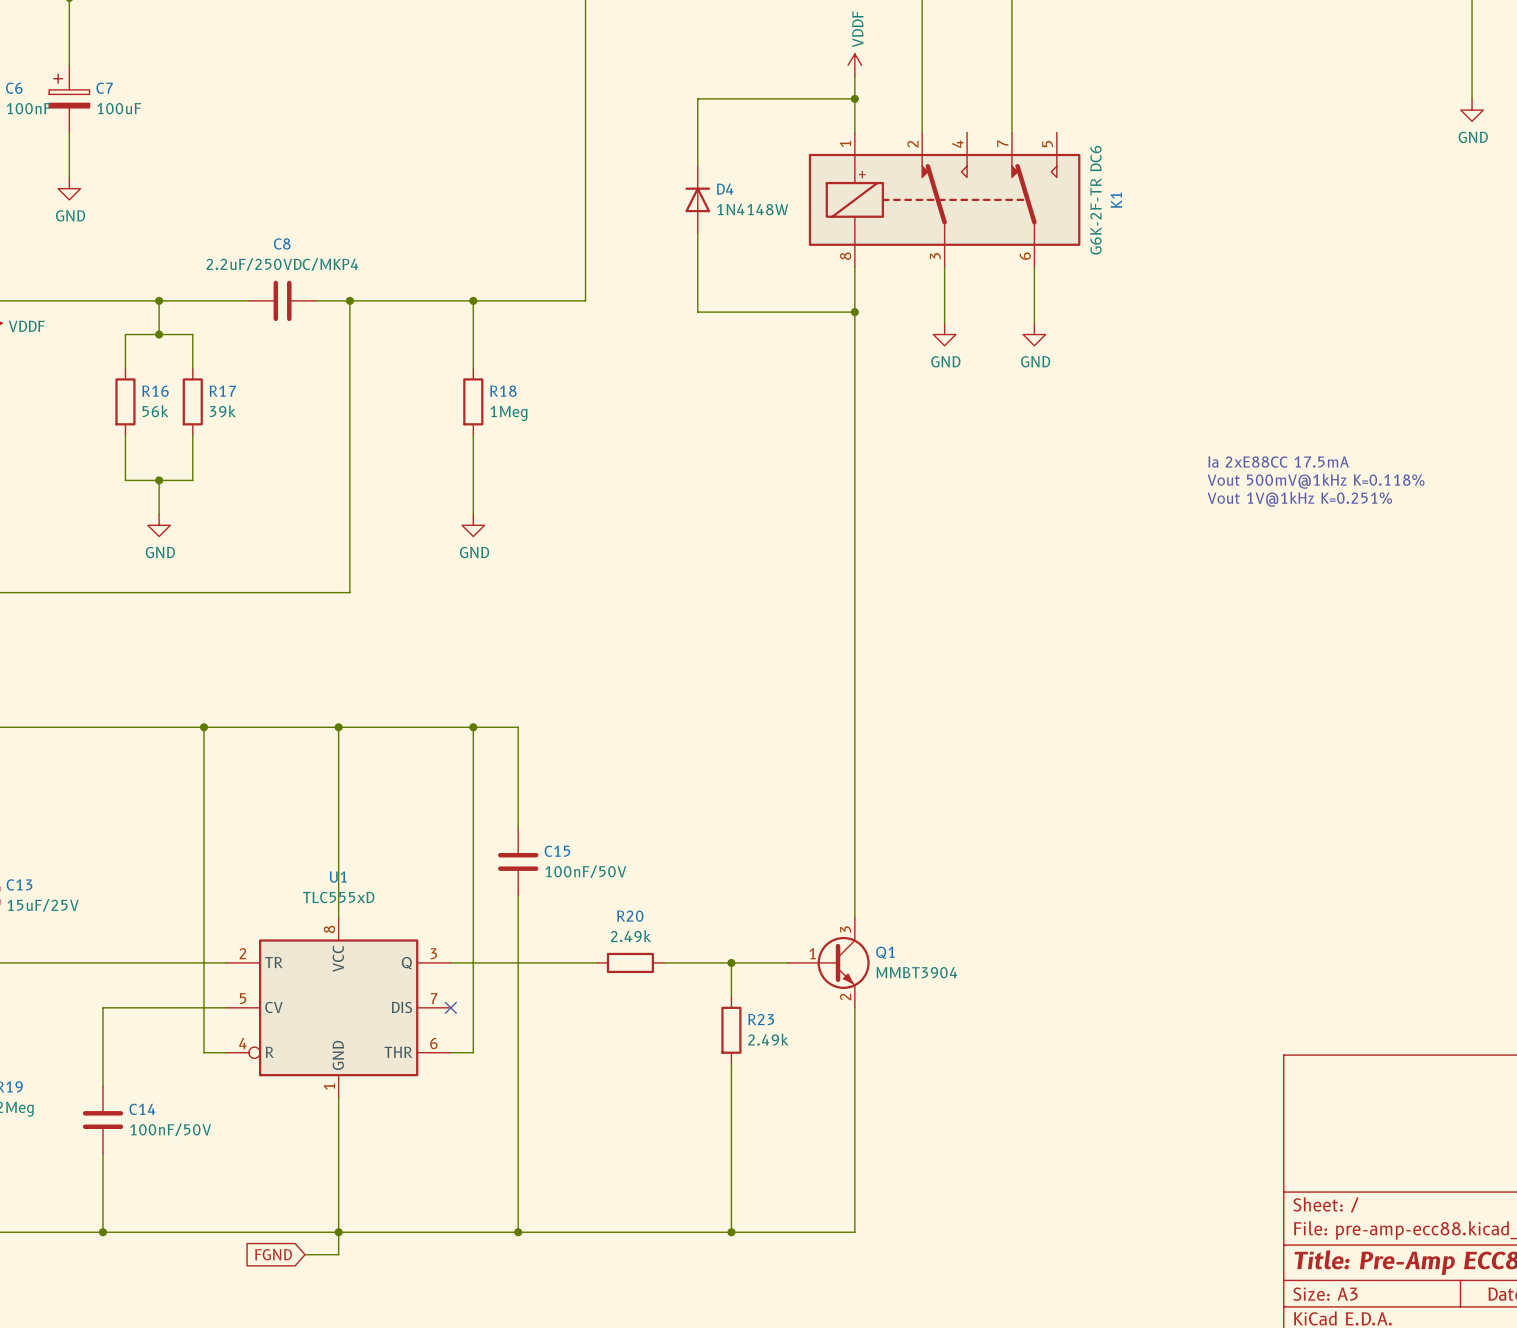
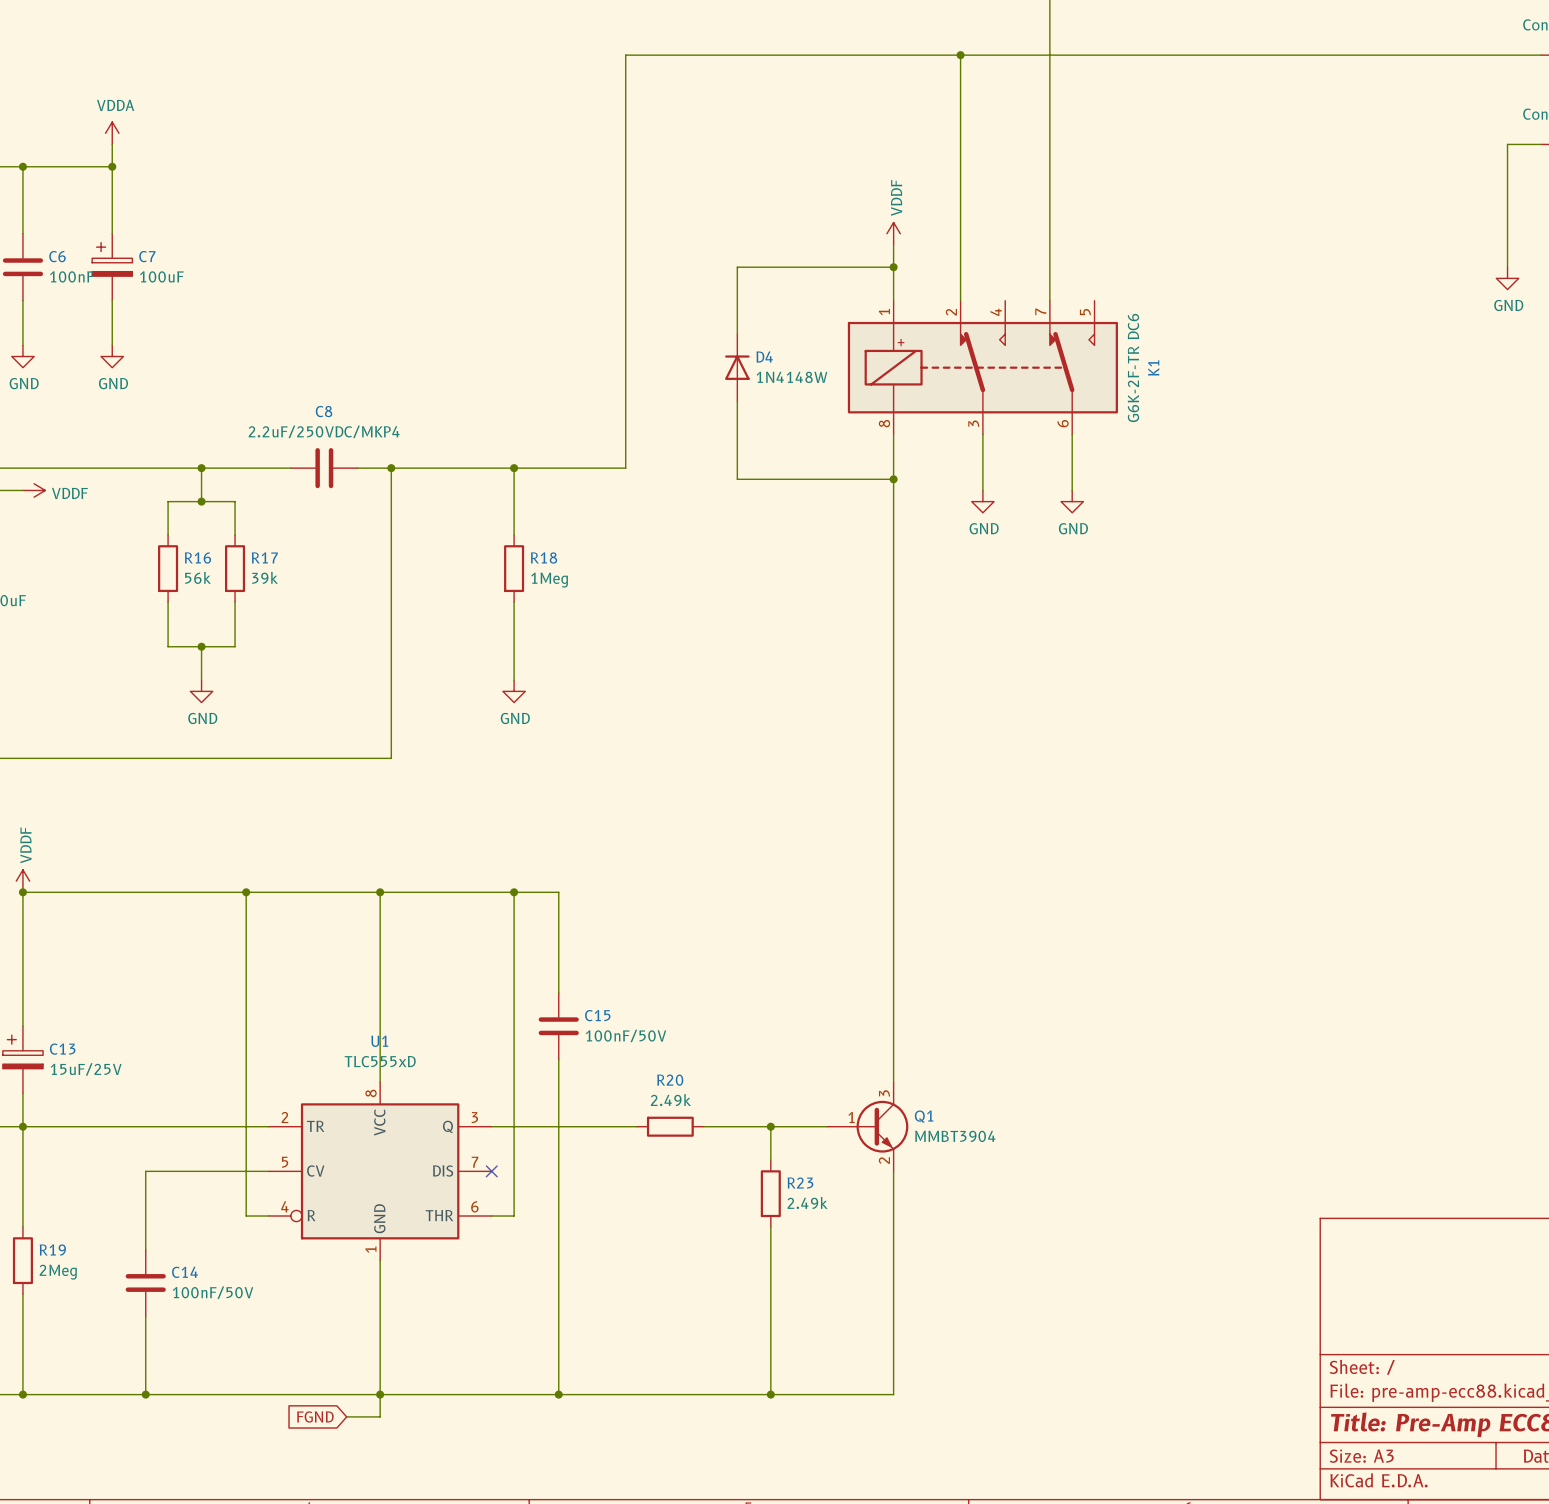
text: Ia 2xE88CC 17.5mA (1278, 462) -> none
text: Vout 500mV@1kHz K=0.118% (1316, 481) -> none
text: Vout 1V@1kHz K=0.251% (1299, 499) -> none

